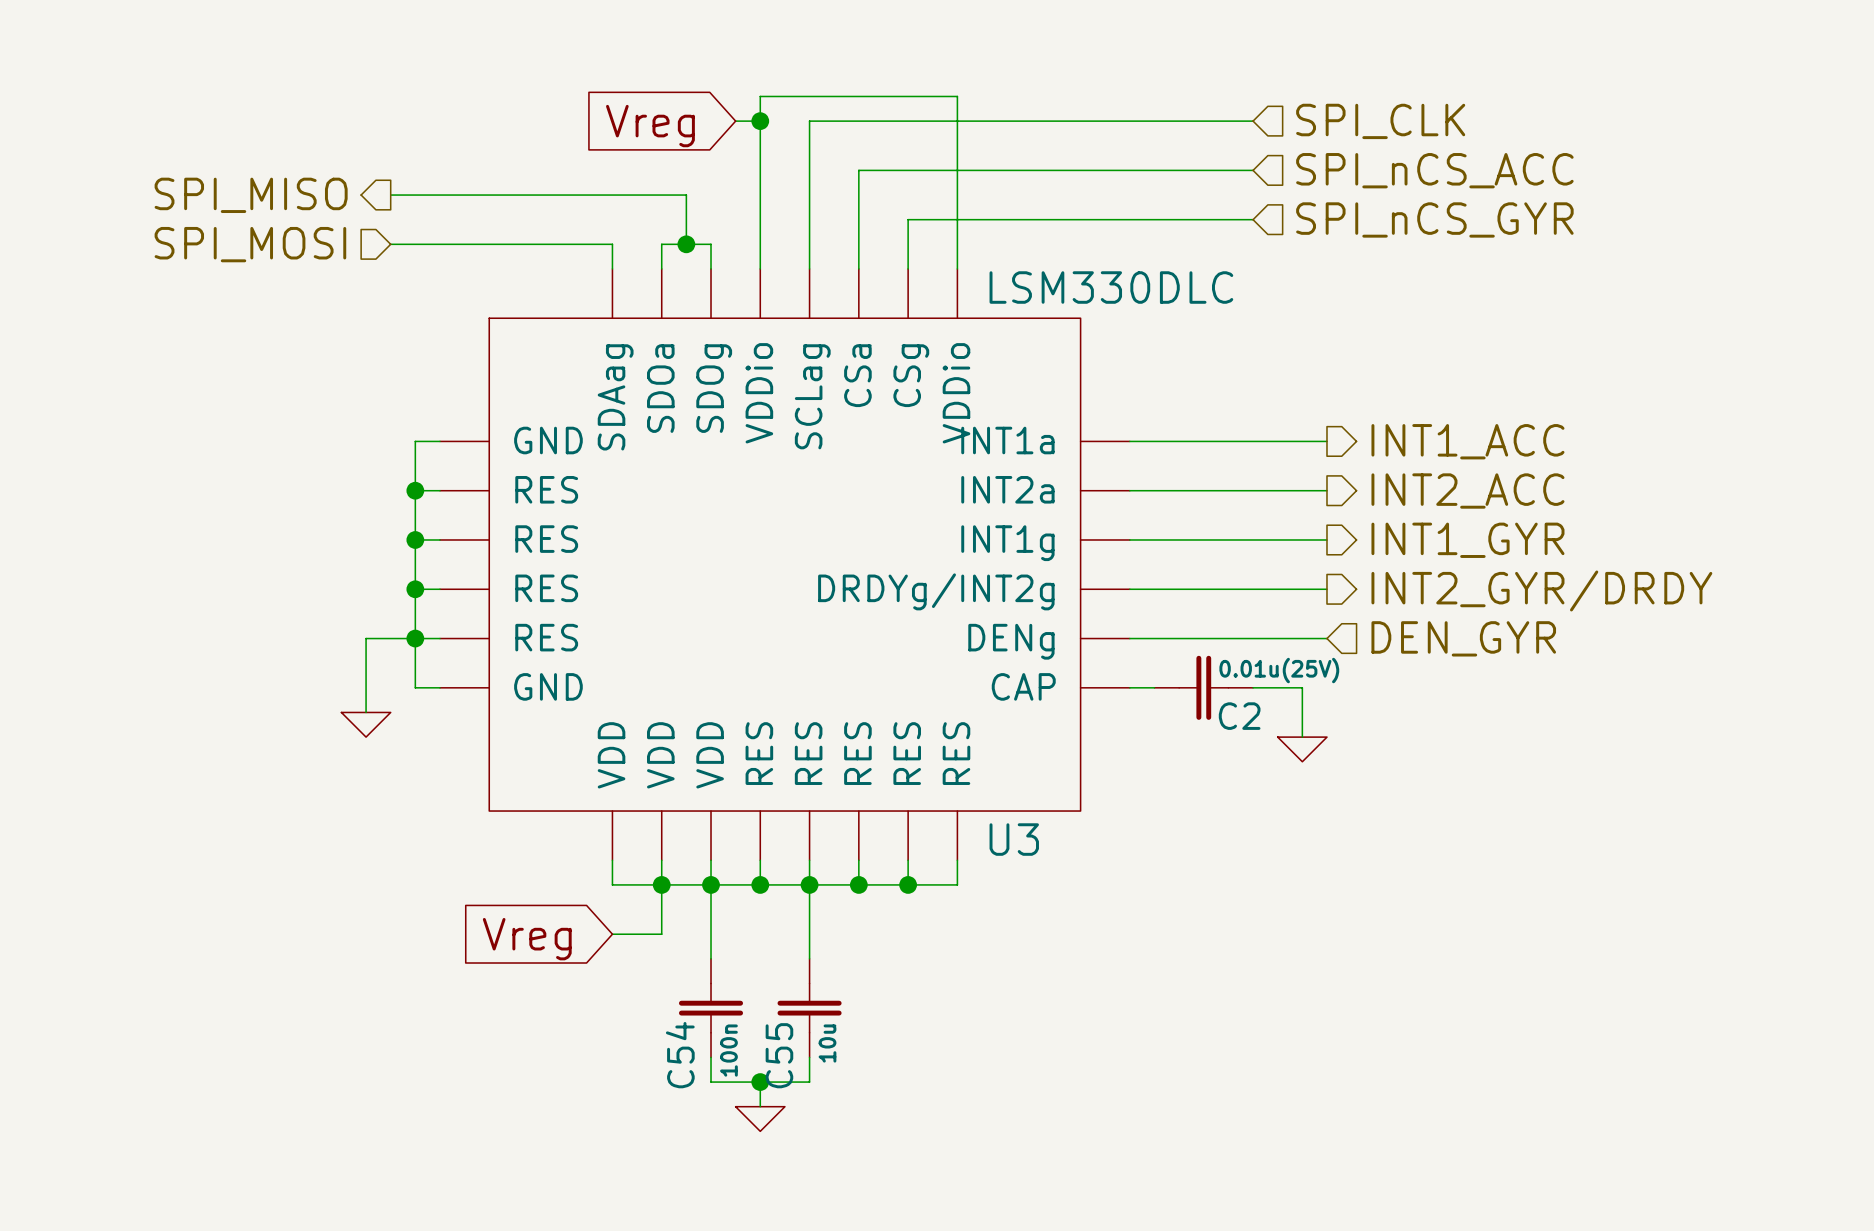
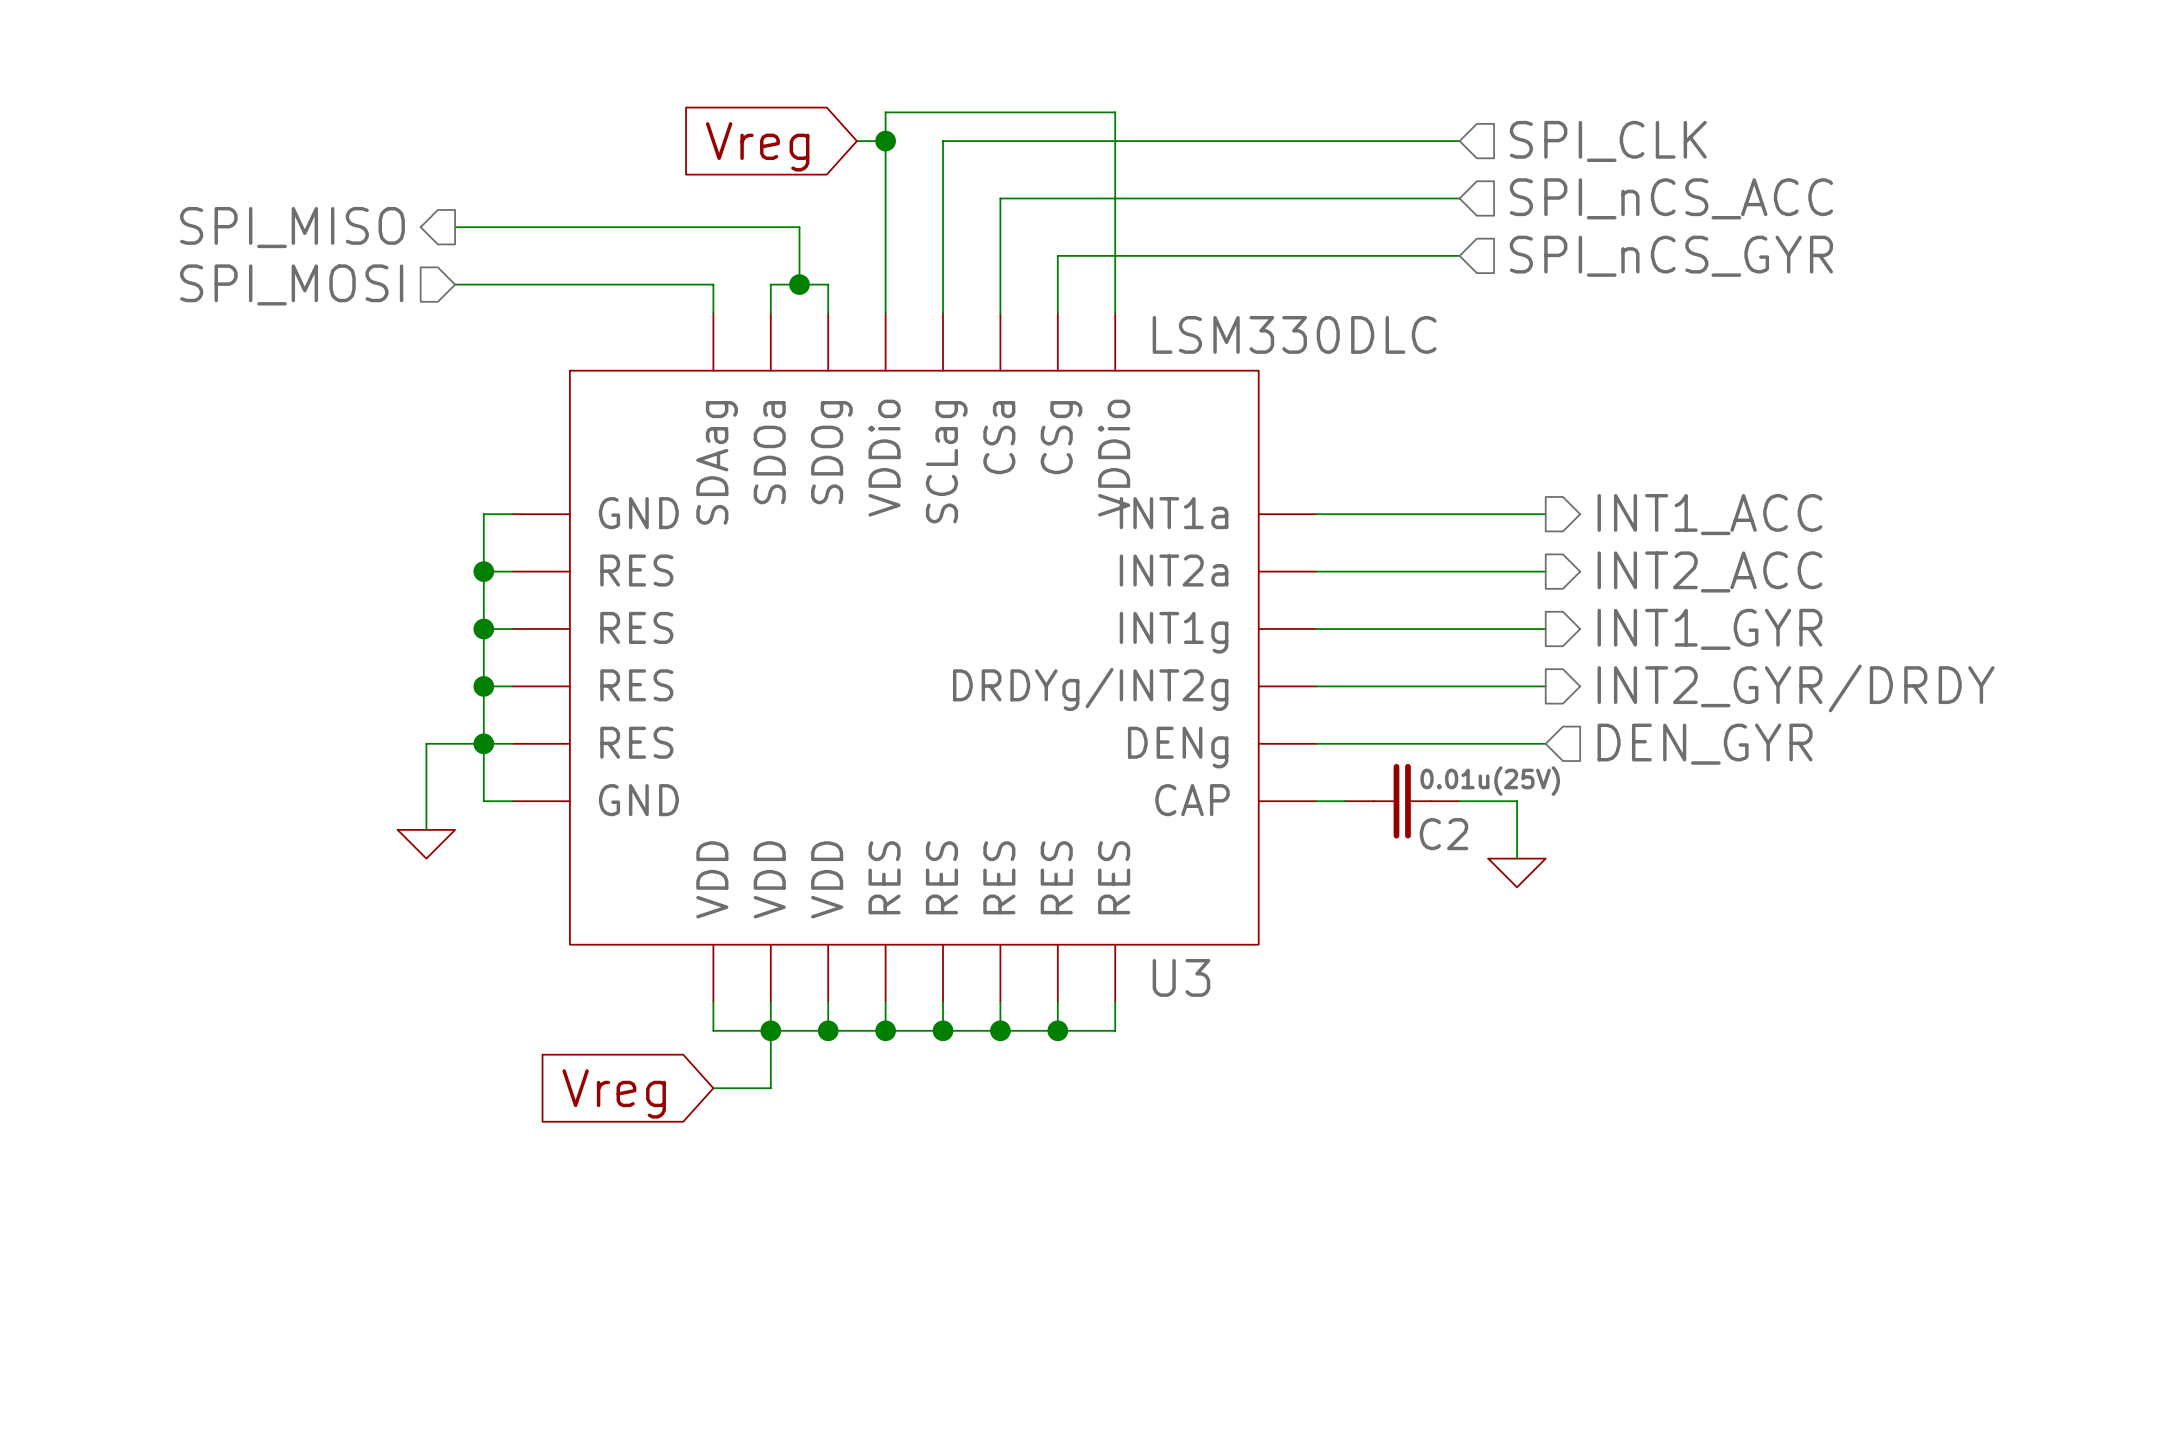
wire: (711, 884) (711, 958) -> none
wire: (809, 884) (809, 958) -> none
C54: 100n (711, 1008) -> none
C55: 10u (809, 1008) -> none
wire: (711, 1057) (711, 1082) (809, 1082) (809, 1057) -> none
wire: (760, 1082) (760, 1106) -> none
junction: (760, 1082) -> none
power symbol: (760, 1119) -> none

